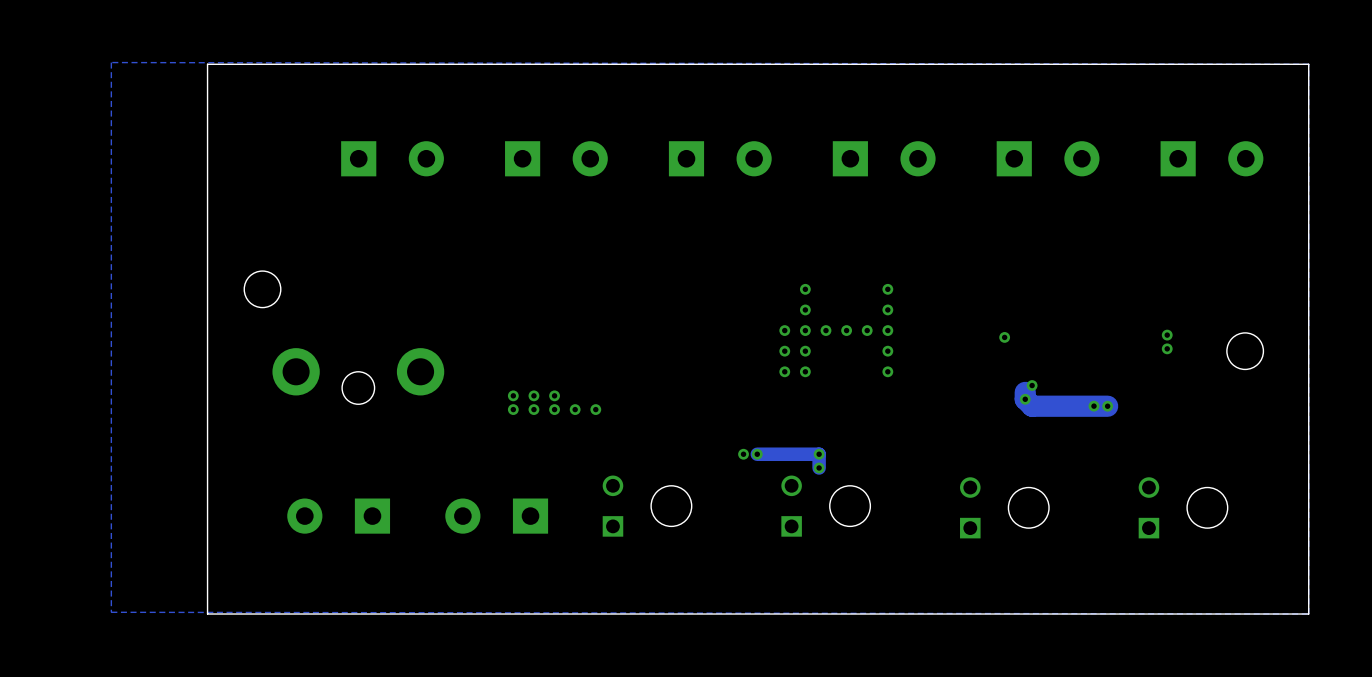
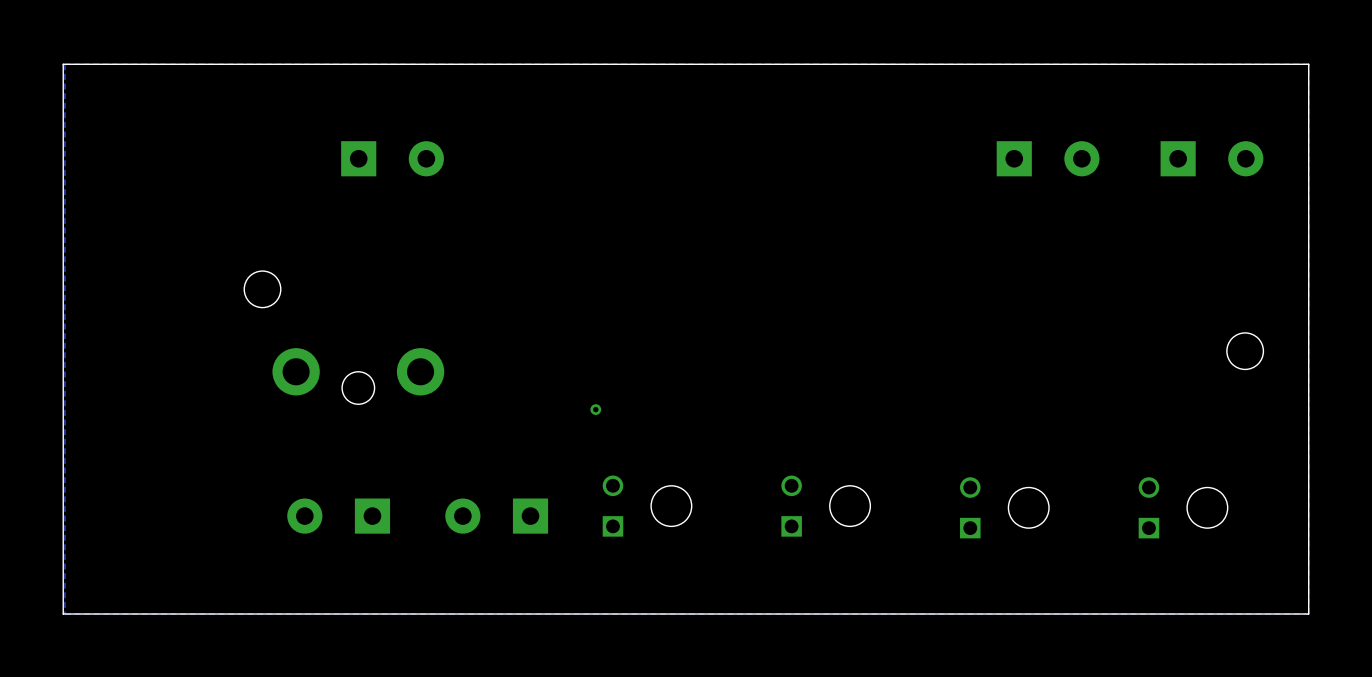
board edge: (207, 64) (207, 614) -> (207, 64) (63, 64) (63, 614) (207, 614)
zone outline: (1308, 64) (111, 62) (111, 612) (1308, 614) -> (1308, 64) (64, 64) (64, 614) (1308, 614)
part: (556, 158) -> none
part: (720, 158) -> none
part: (884, 158) -> none
via: (805, 289) -> none
via: (887, 289) -> none
via: (805, 309) -> none
via: (887, 309) -> none
via: (784, 330) -> none
via: (805, 330) -> none
via: (825, 330) -> none
via: (846, 330) -> none
via: (867, 330) -> none
via: (887, 330) -> none
via: (1167, 335) -> none
via: (1004, 337) -> none
via: (1167, 348) -> none
via: (784, 351) -> none
via: (805, 351) -> none
via: (887, 351) -> none
via: (784, 371) -> none
via: (805, 371) -> none
via: (887, 371) -> none
via: (1032, 385) -> none
track: (1025, 392) (1025, 399) (1032, 406) (1107, 406) -> none
via: (513, 395) -> none
via: (533, 395) -> none
via: (554, 395) -> none
via: (1025, 399) -> none
via: (1093, 406) -> none
via: (1107, 406) -> none
via: (513, 409) -> none
via: (533, 409) -> none
via: (554, 409) -> none
via: (575, 409) -> none
via: (743, 454) -> none
track: (757, 454) (819, 454) (819, 467) -> none
via: (757, 454) -> none
via: (819, 454) -> none
via: (819, 467) -> none

